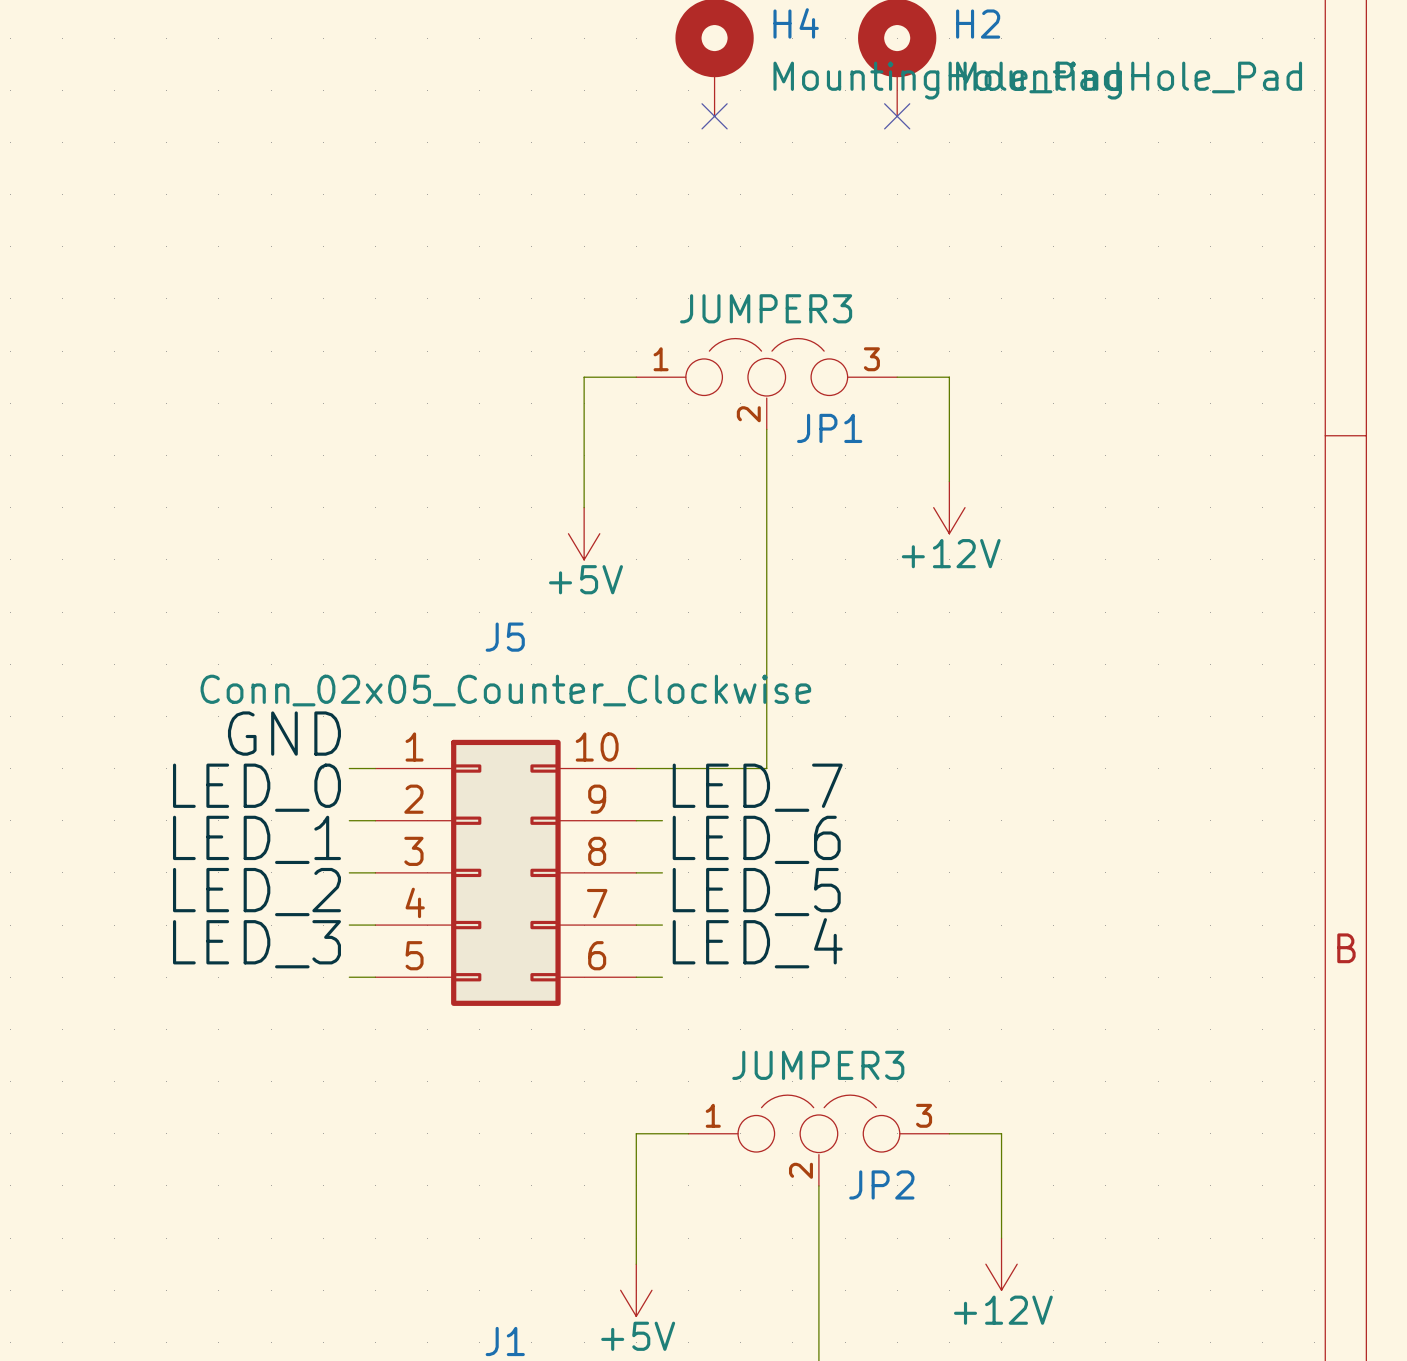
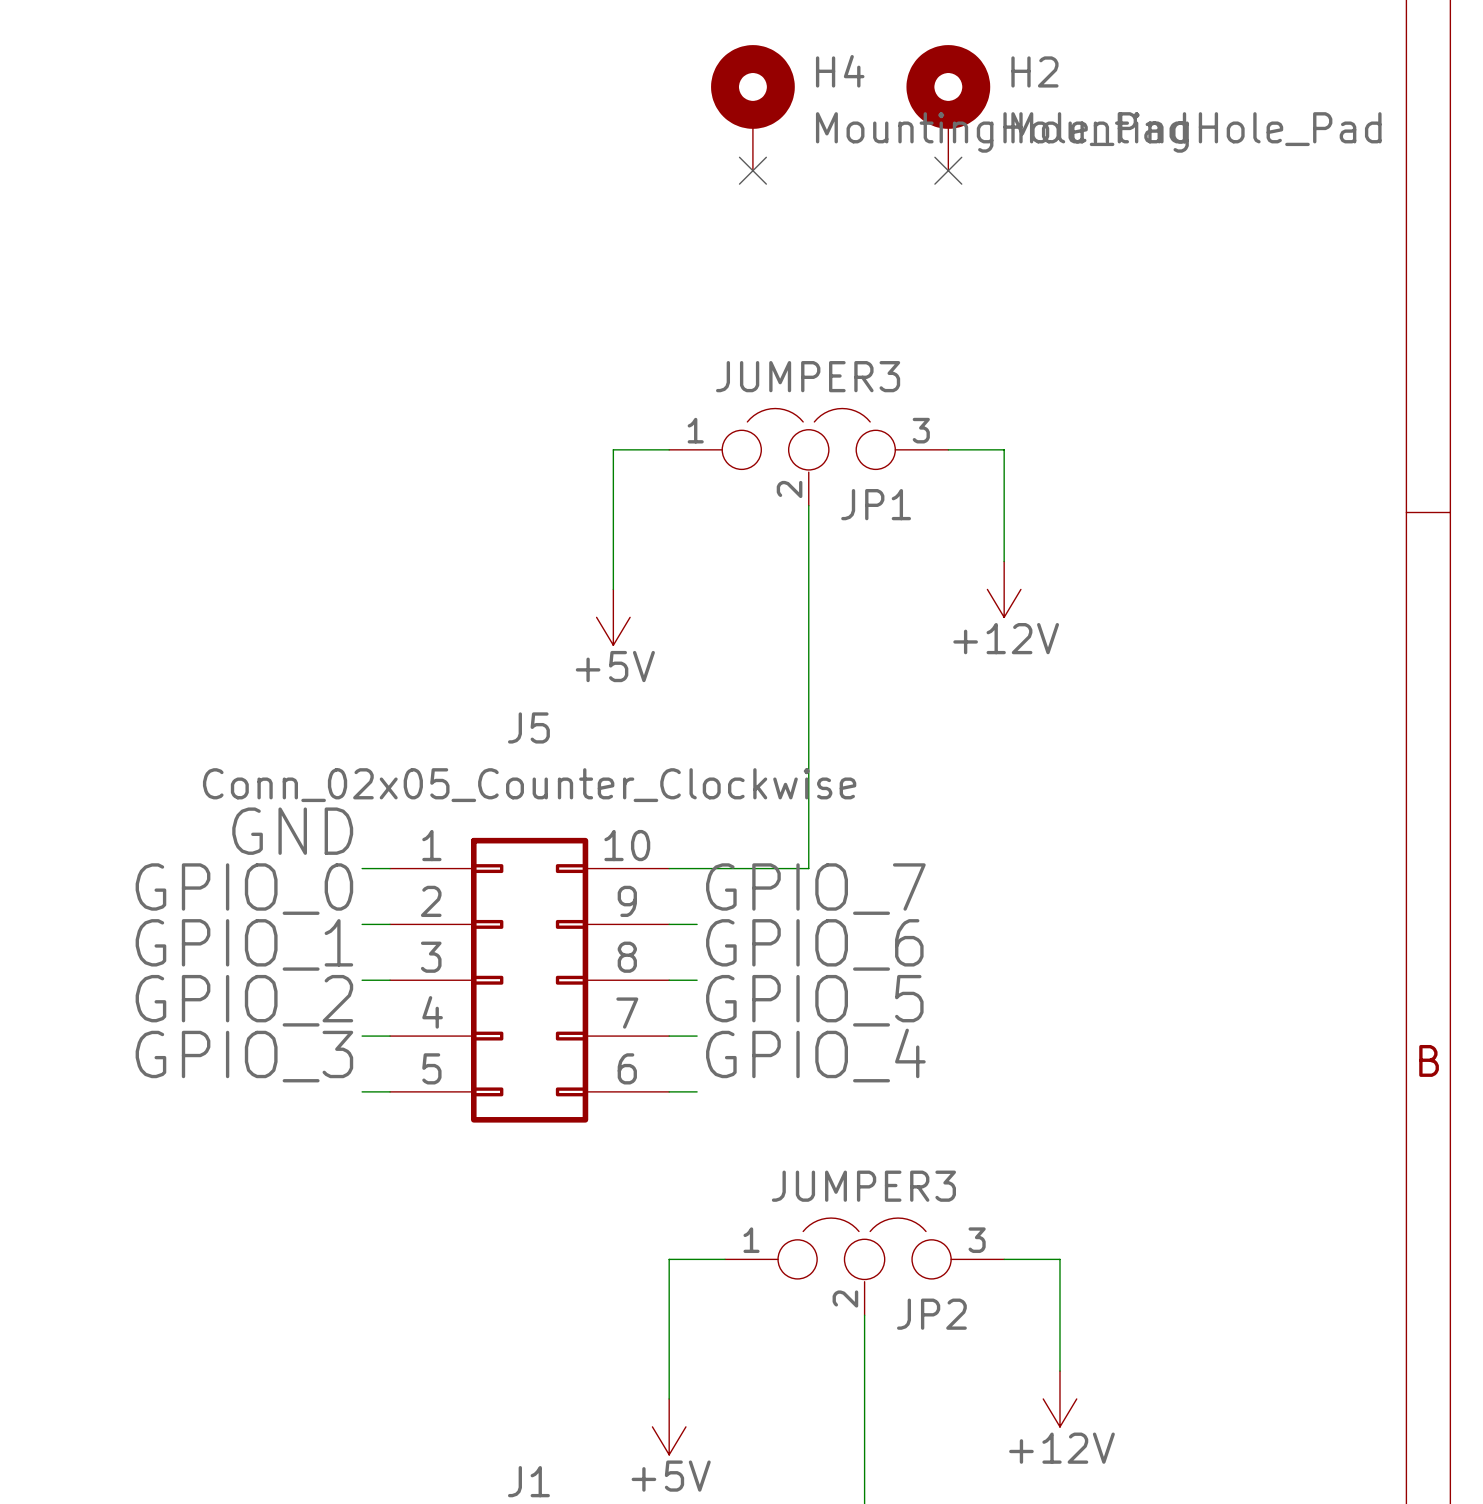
label: LED_0 (256, 787) -> GPIO_0 (244, 889)
label: LED_7 (757, 787) -> GPIO_7 (815, 889)
label: LED_1 (256, 839) -> GPIO_1 (244, 944)
label: LED_6 (756, 839) -> GPIO_6 (814, 944)
label: LED_2 (256, 892) -> GPIO_2 (244, 1000)
label: LED_5 (756, 892) -> GPIO_5 (814, 1000)
label: LED_4 (757, 943) -> GPIO_4 (815, 1055)
label: LED_3 (256, 944) -> GPIO_3 (244, 1056)

